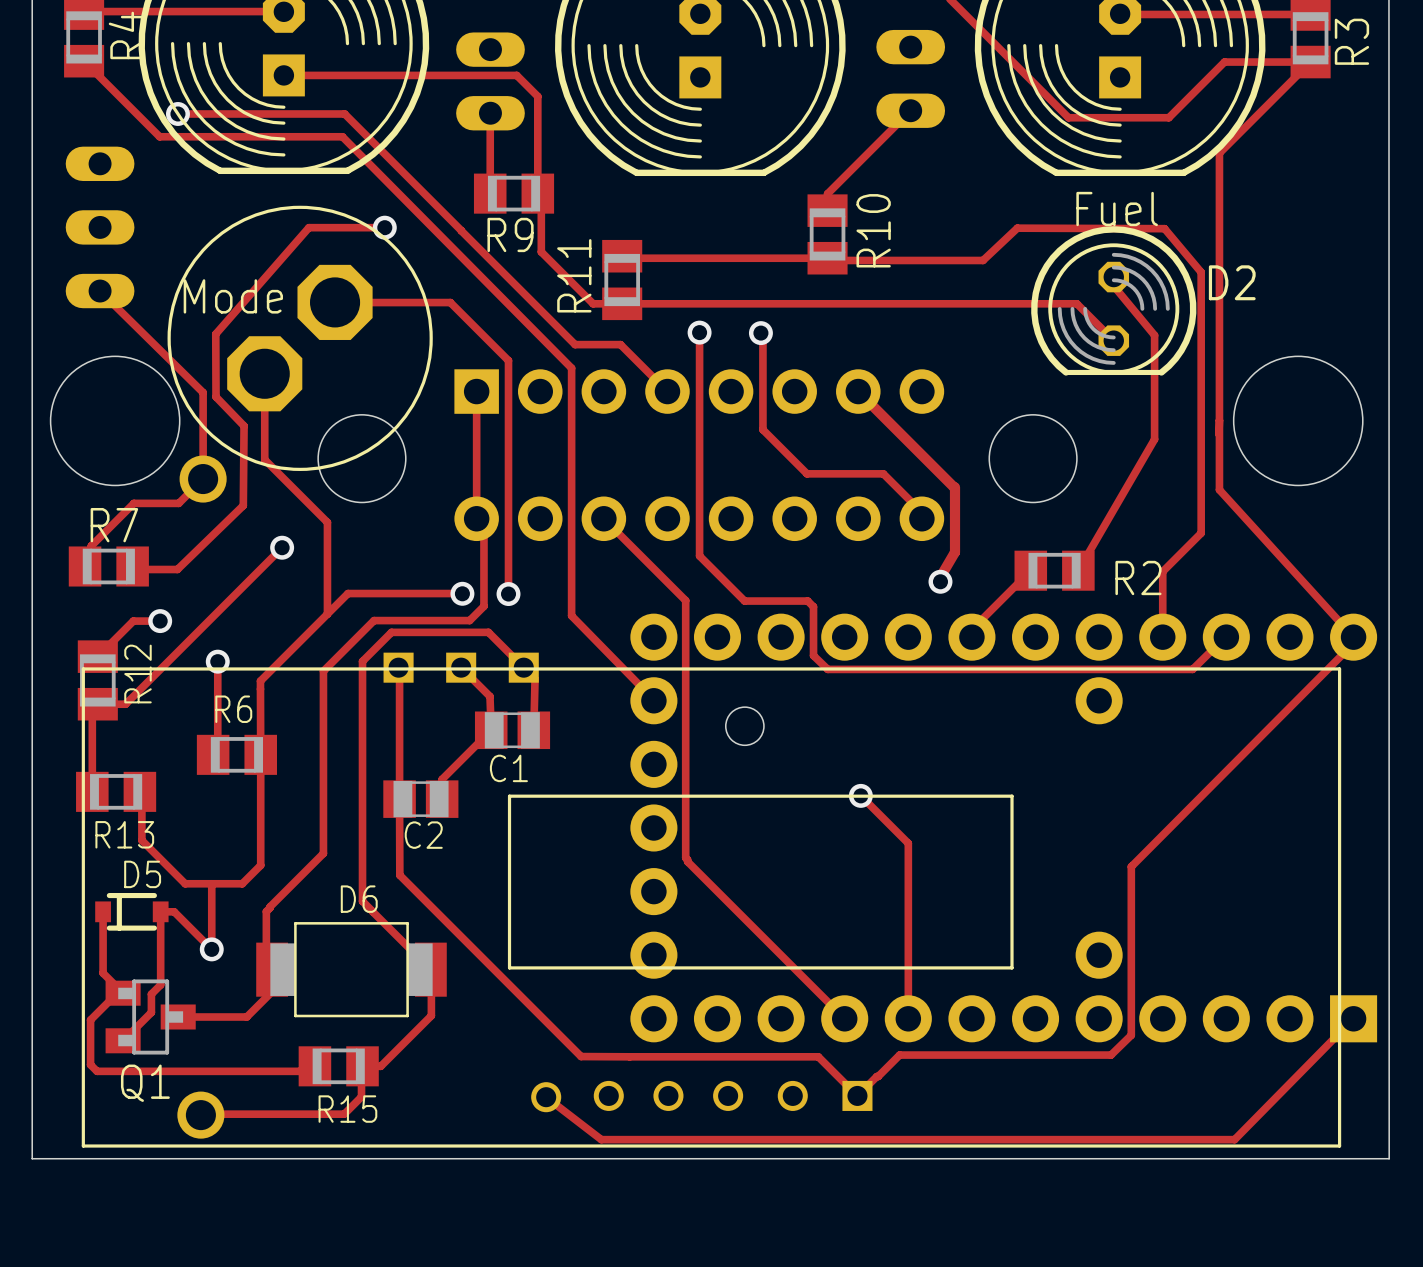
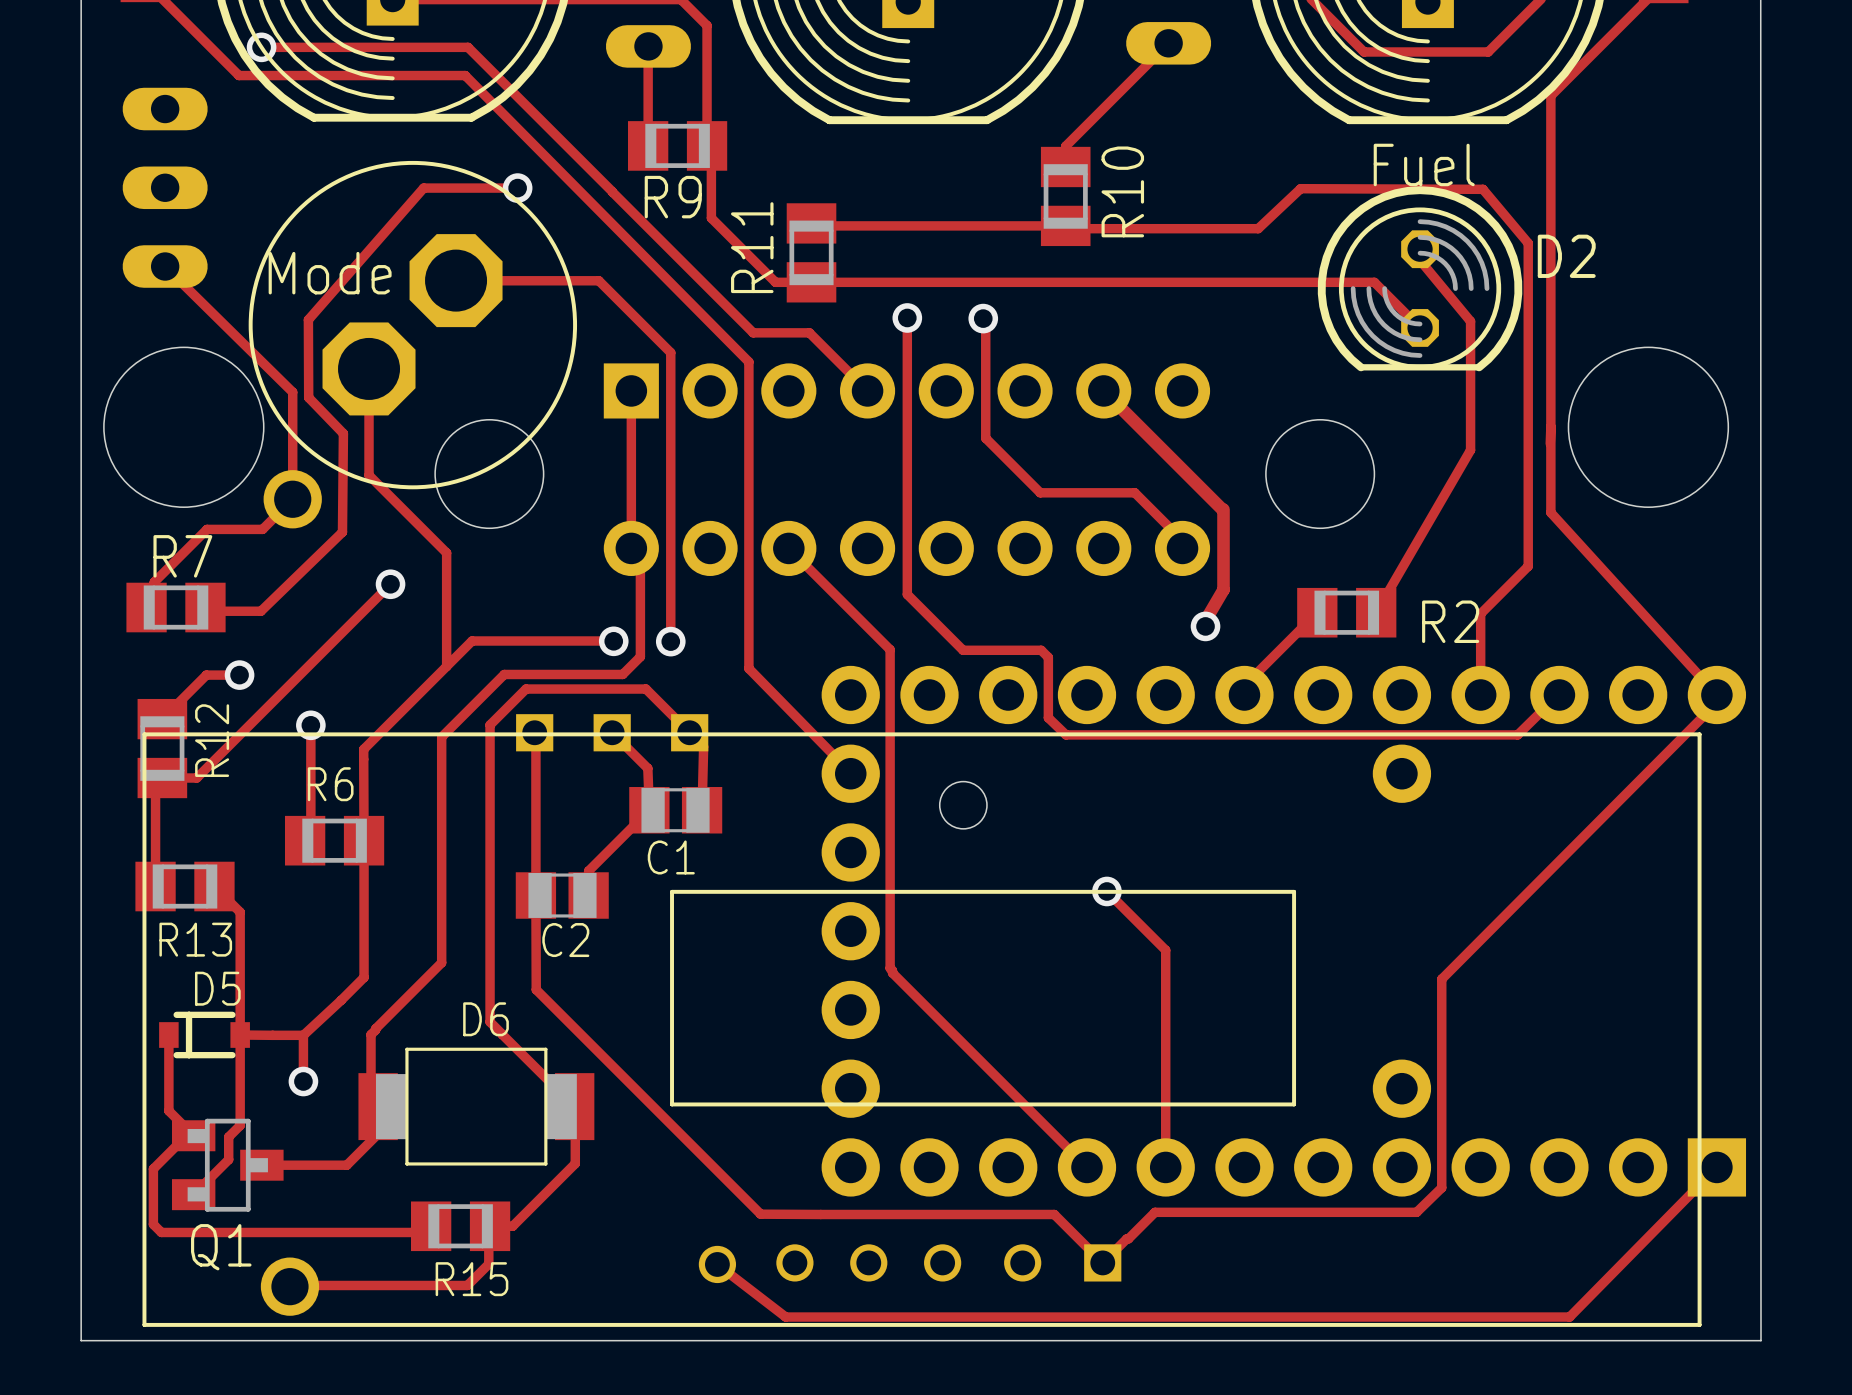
track: (141, 793) (141, 840) (185, 883) (242, 883) -> (216, 888) (240, 912) (240, 1035) (303, 1035) (341, 1000)
track: (211, 883) (211, 912) -> none
track: (160, 911) (174, 911) (211, 949) -> none

